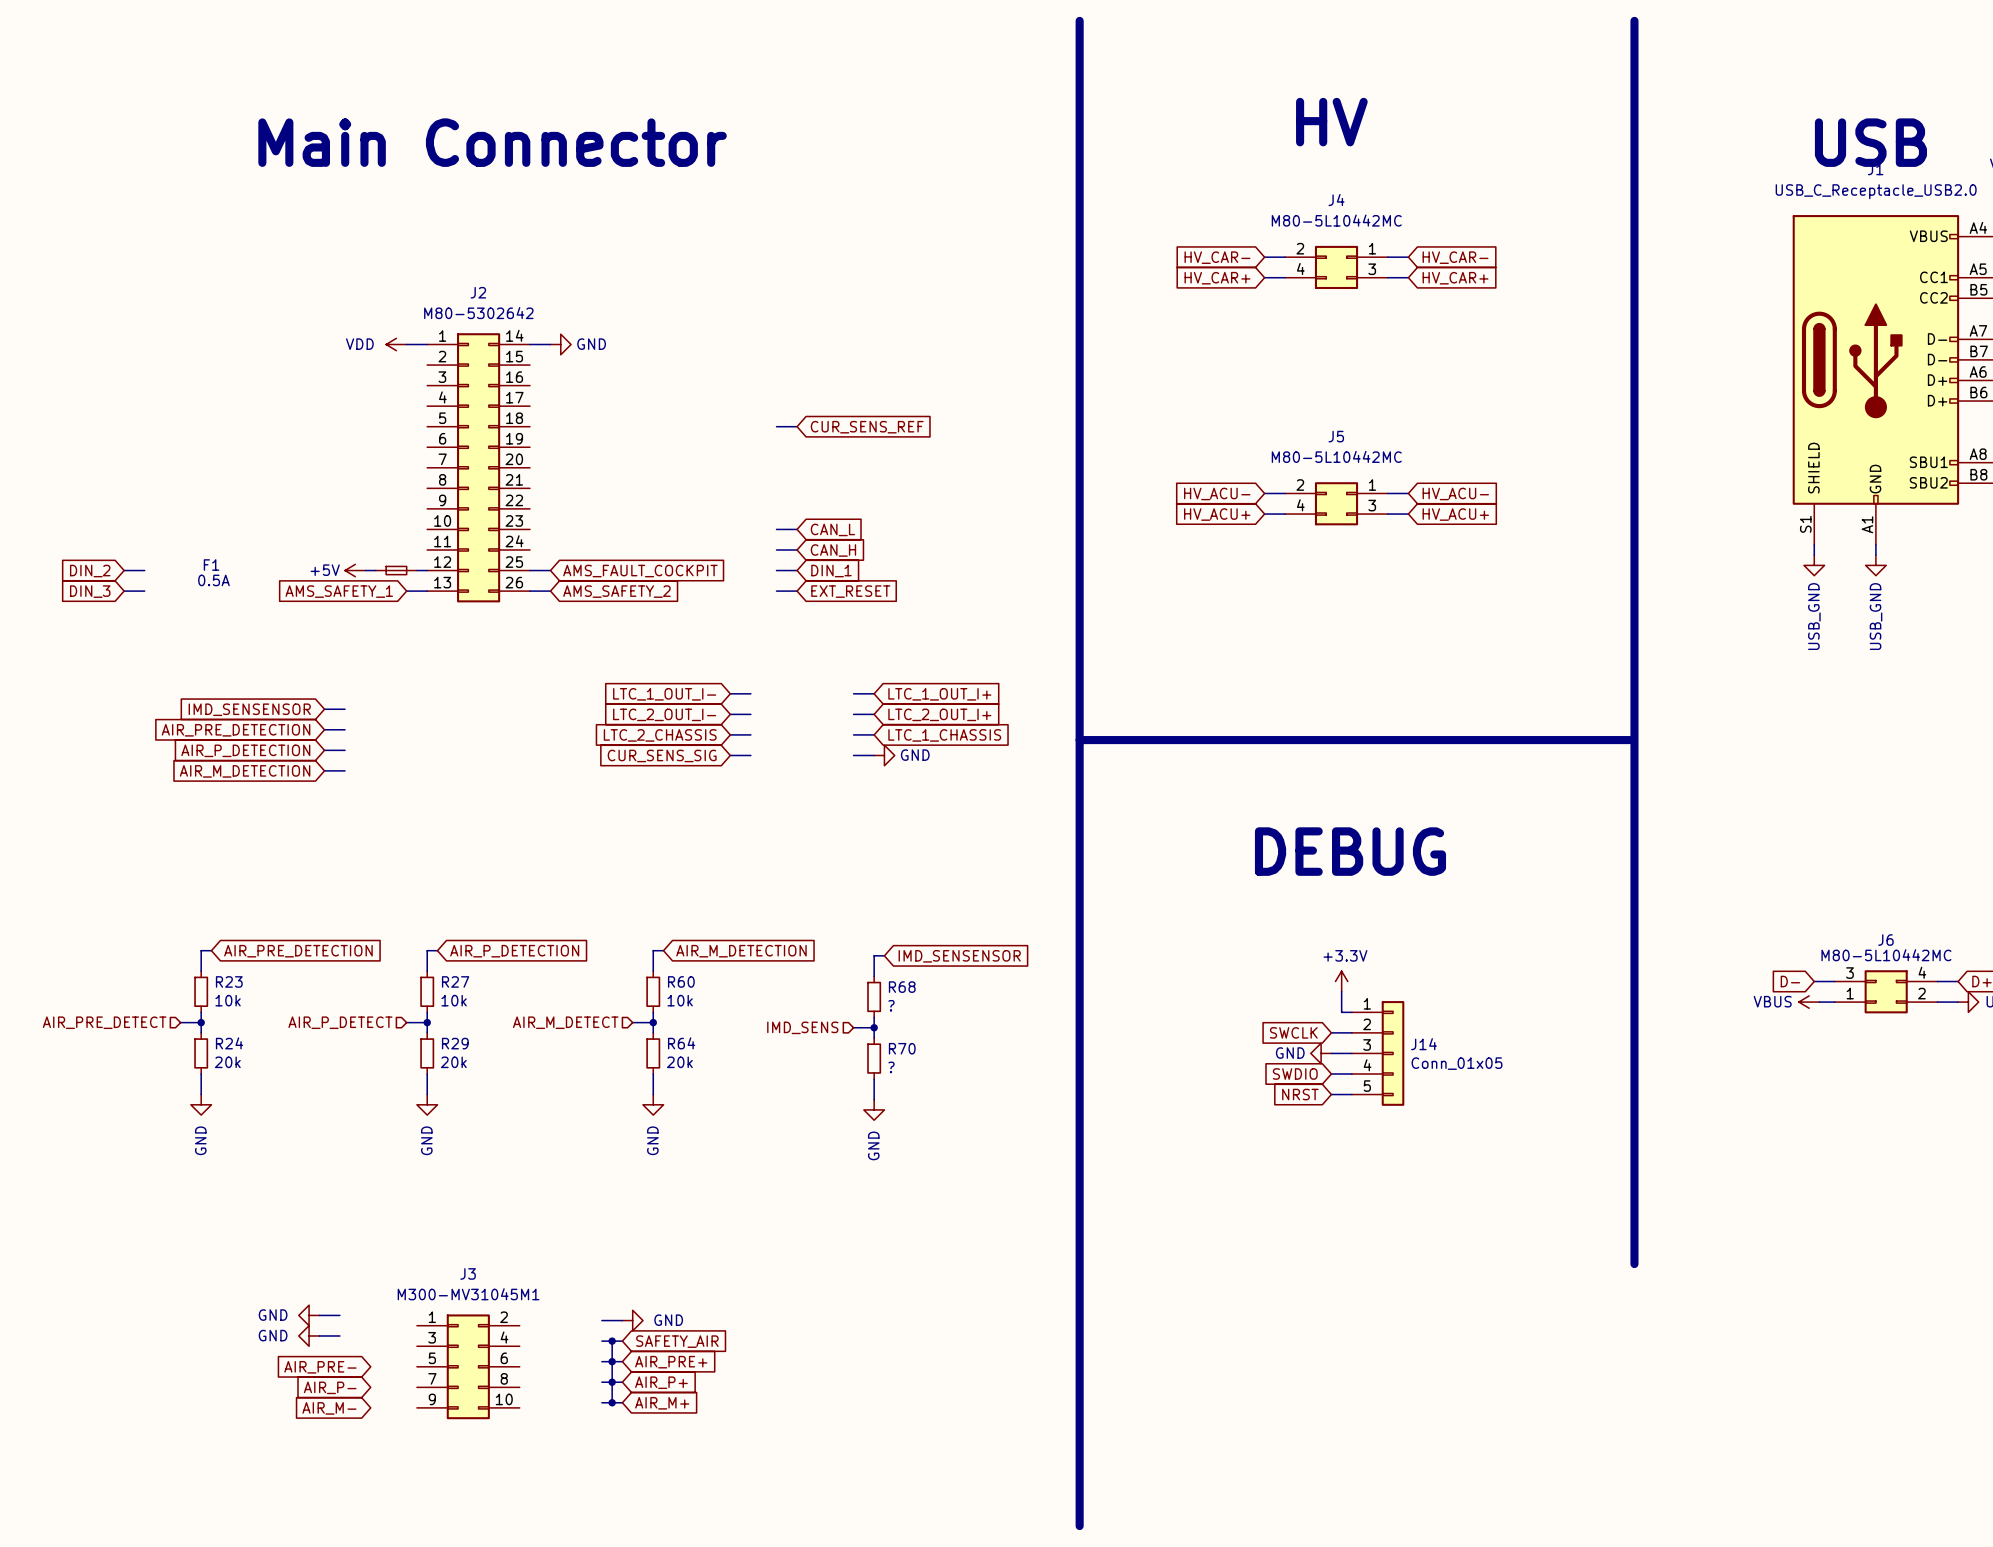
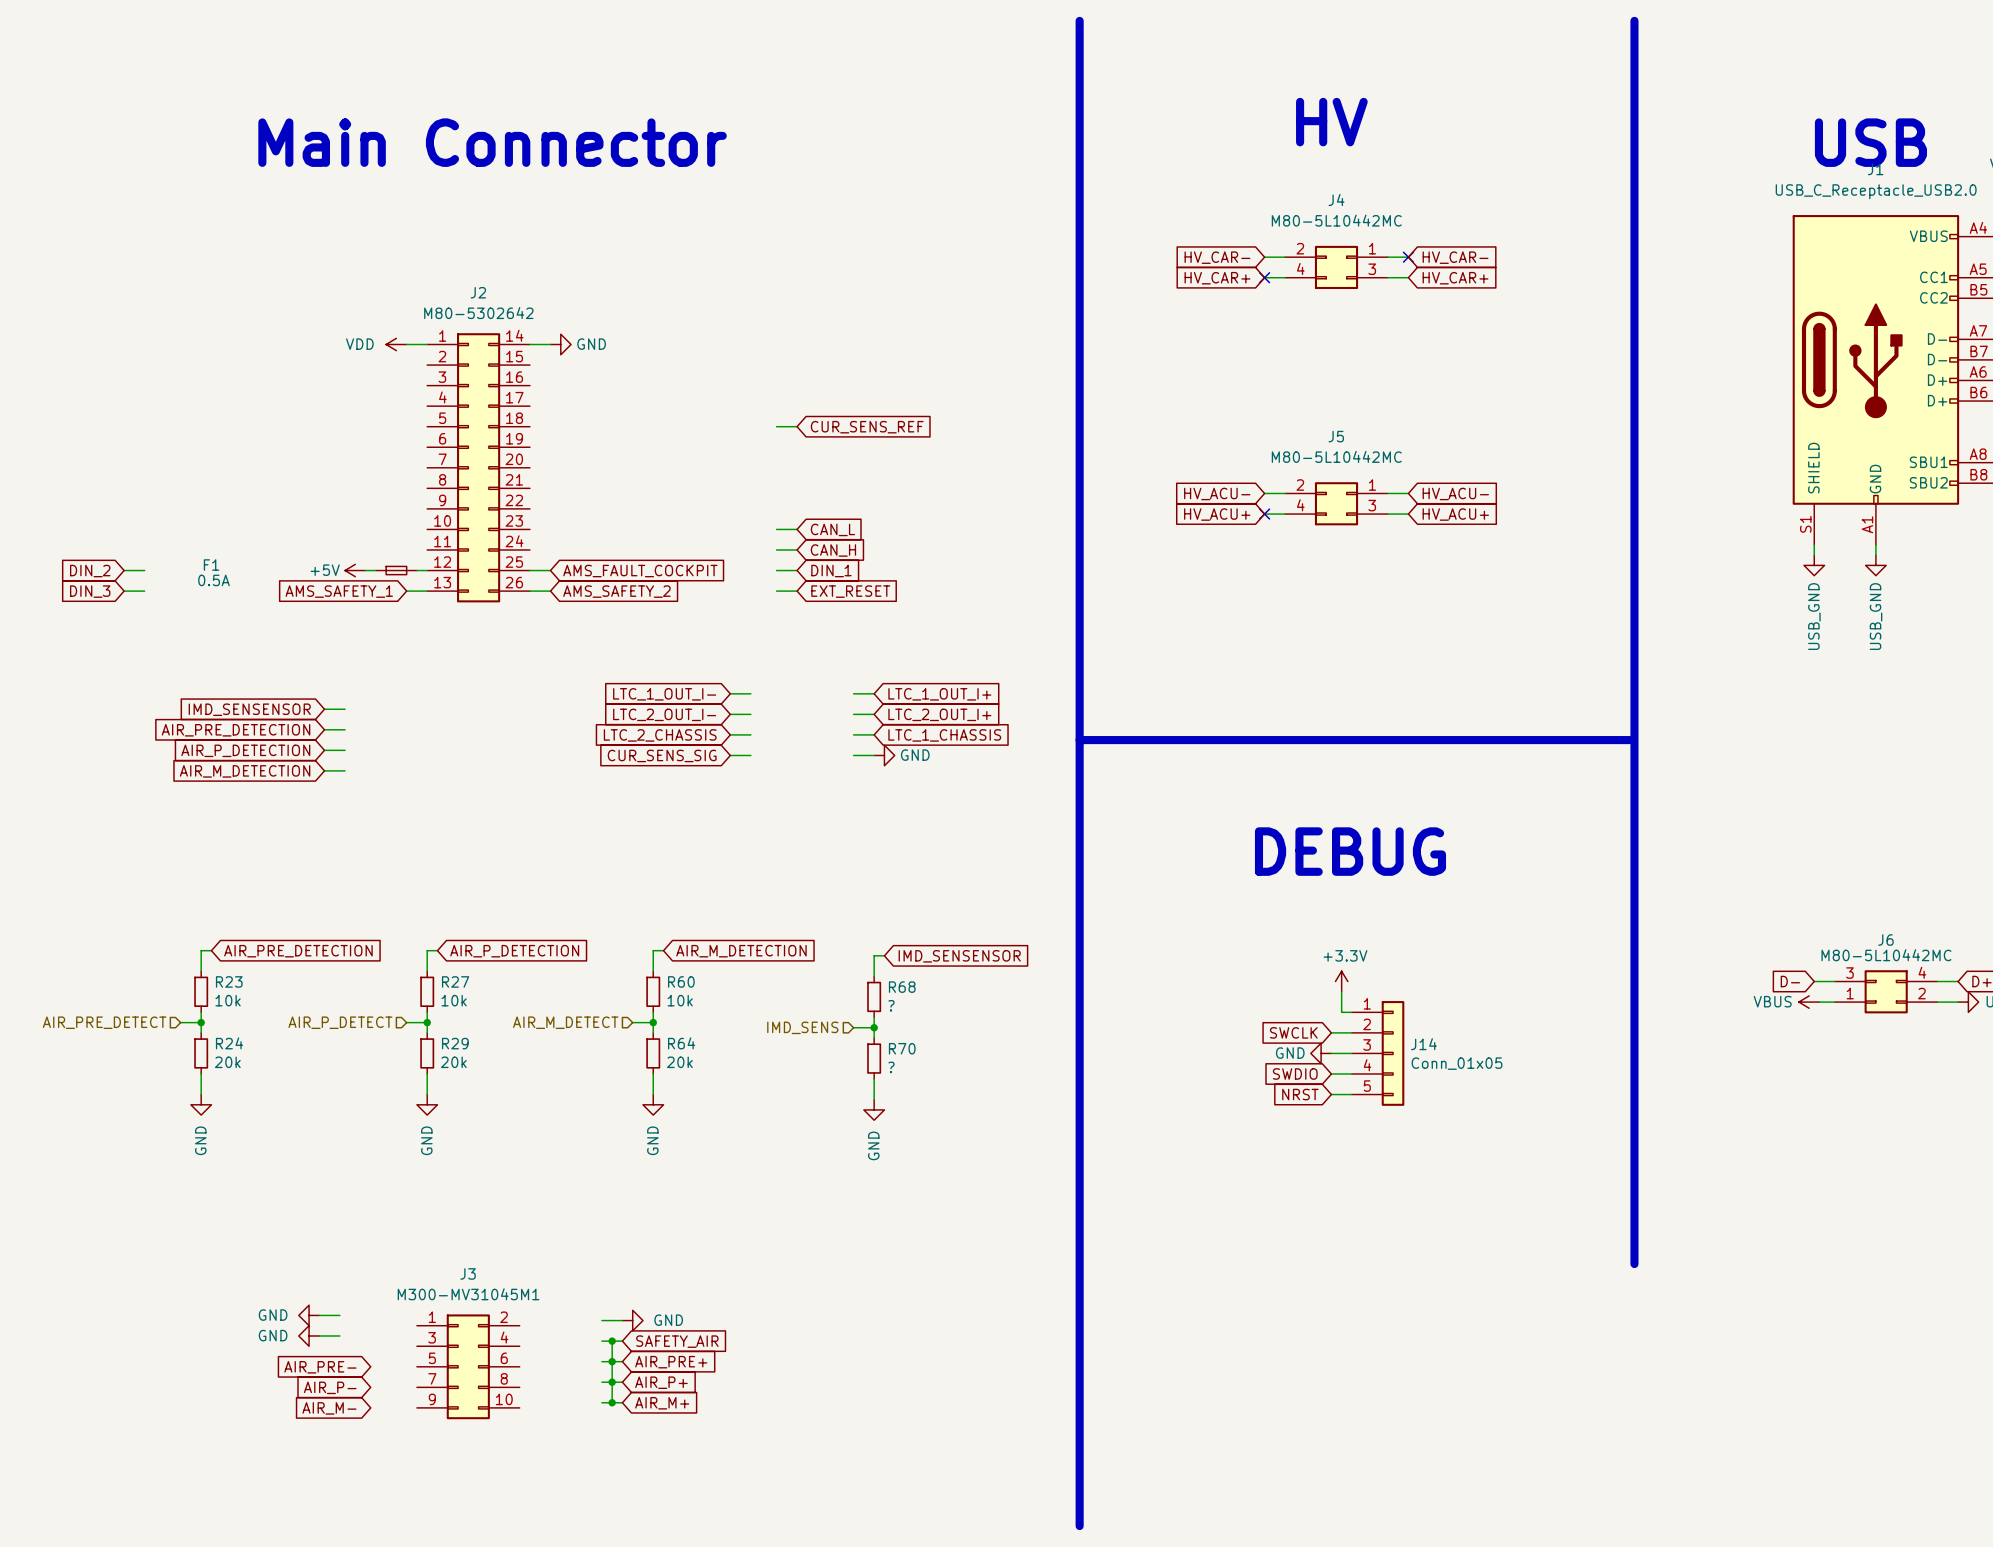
no-connect mark: none -> (1408, 257)
no-connect mark: none -> (1264, 277)
no-connect mark: none -> (1264, 514)

